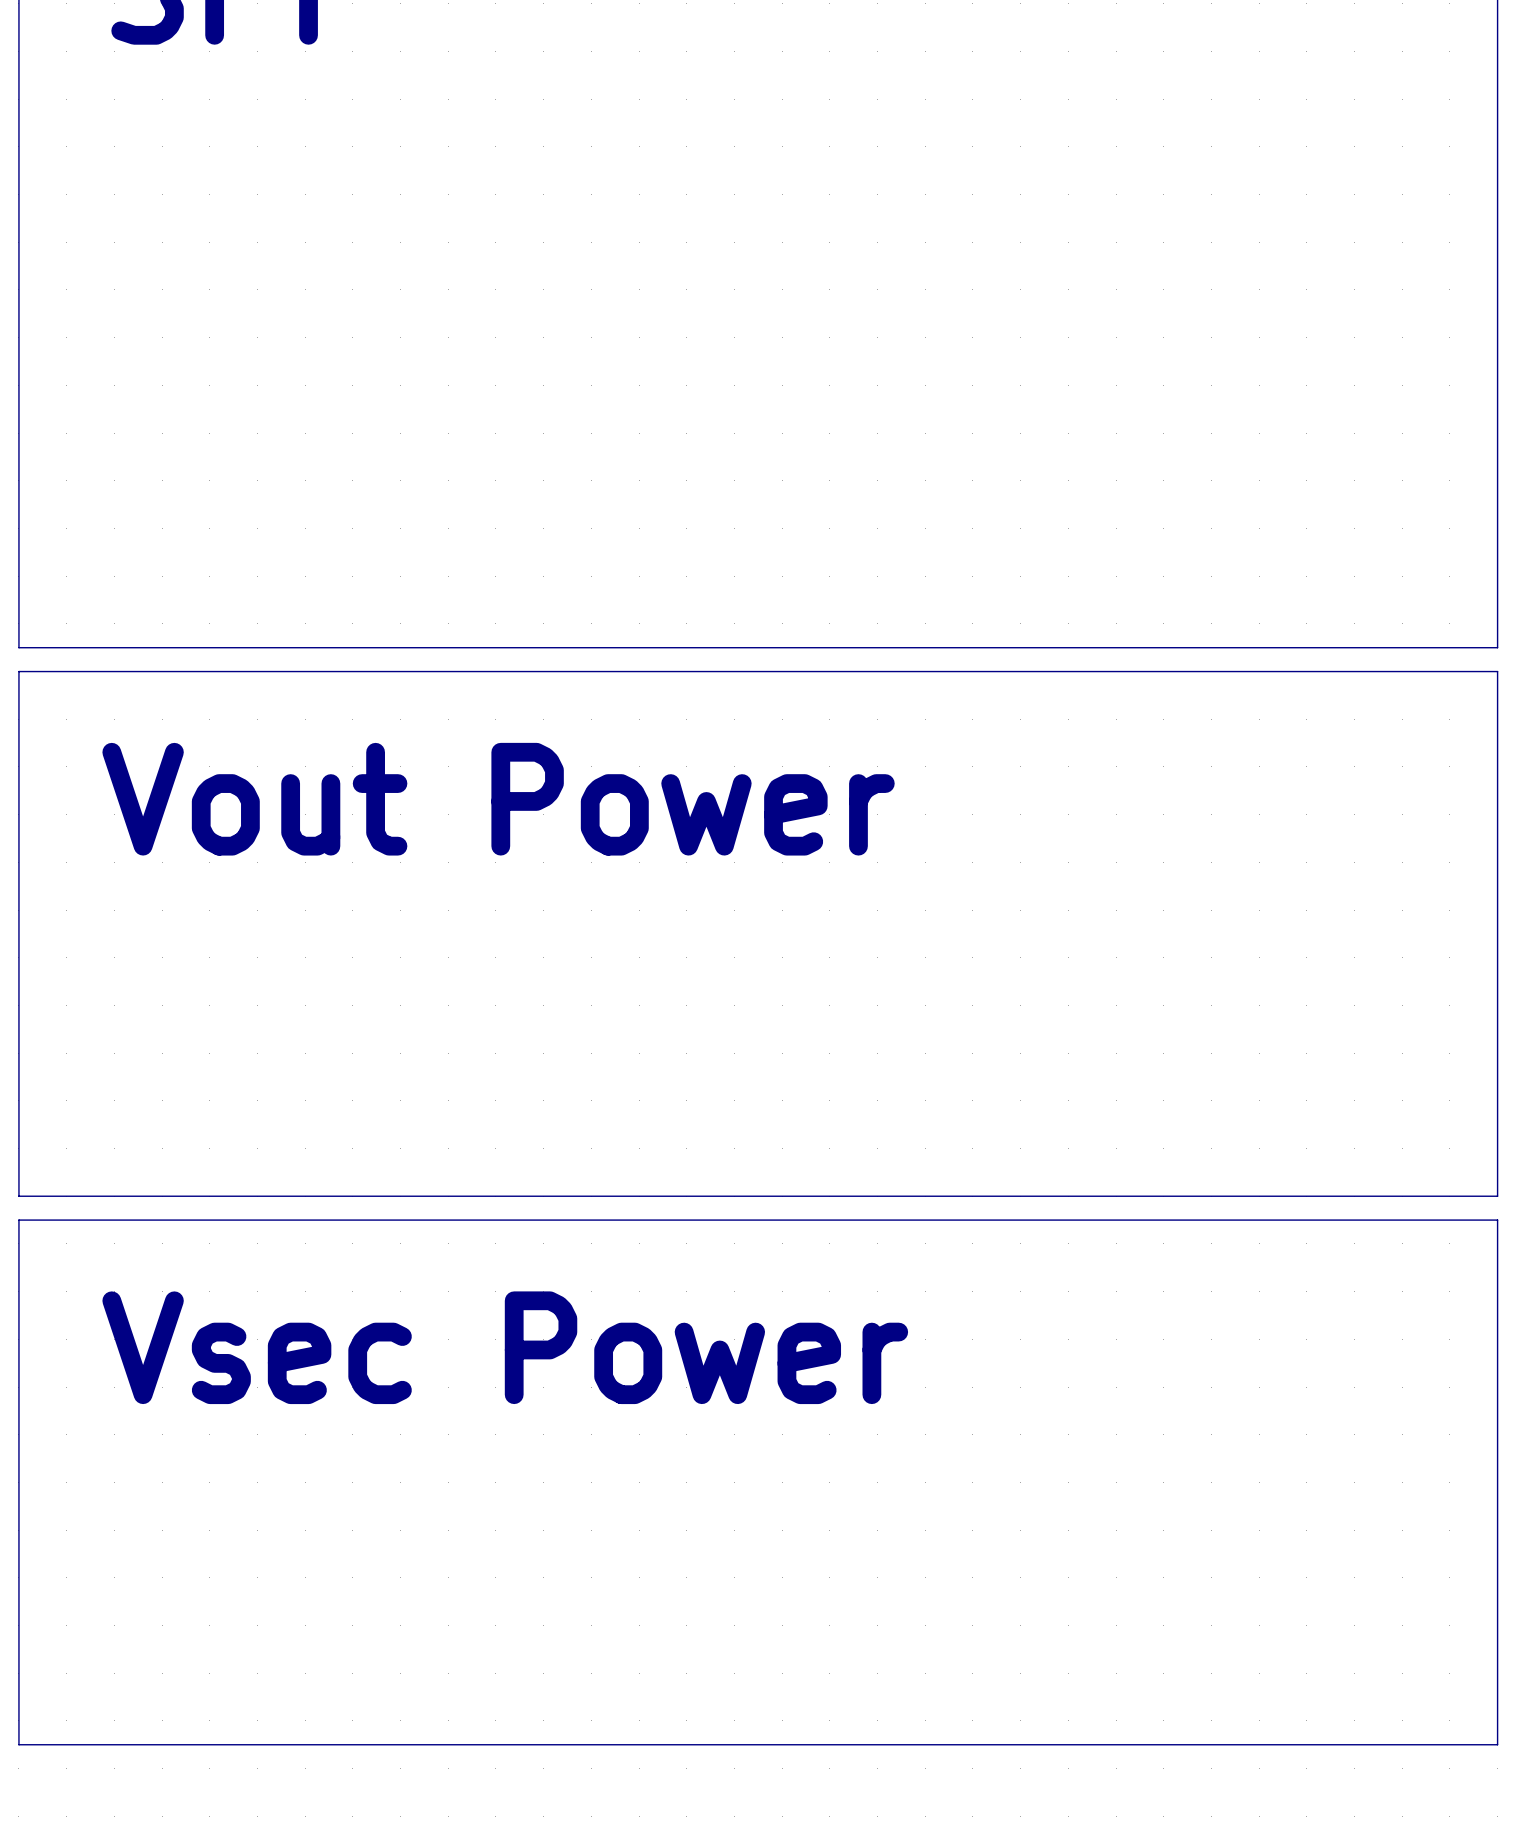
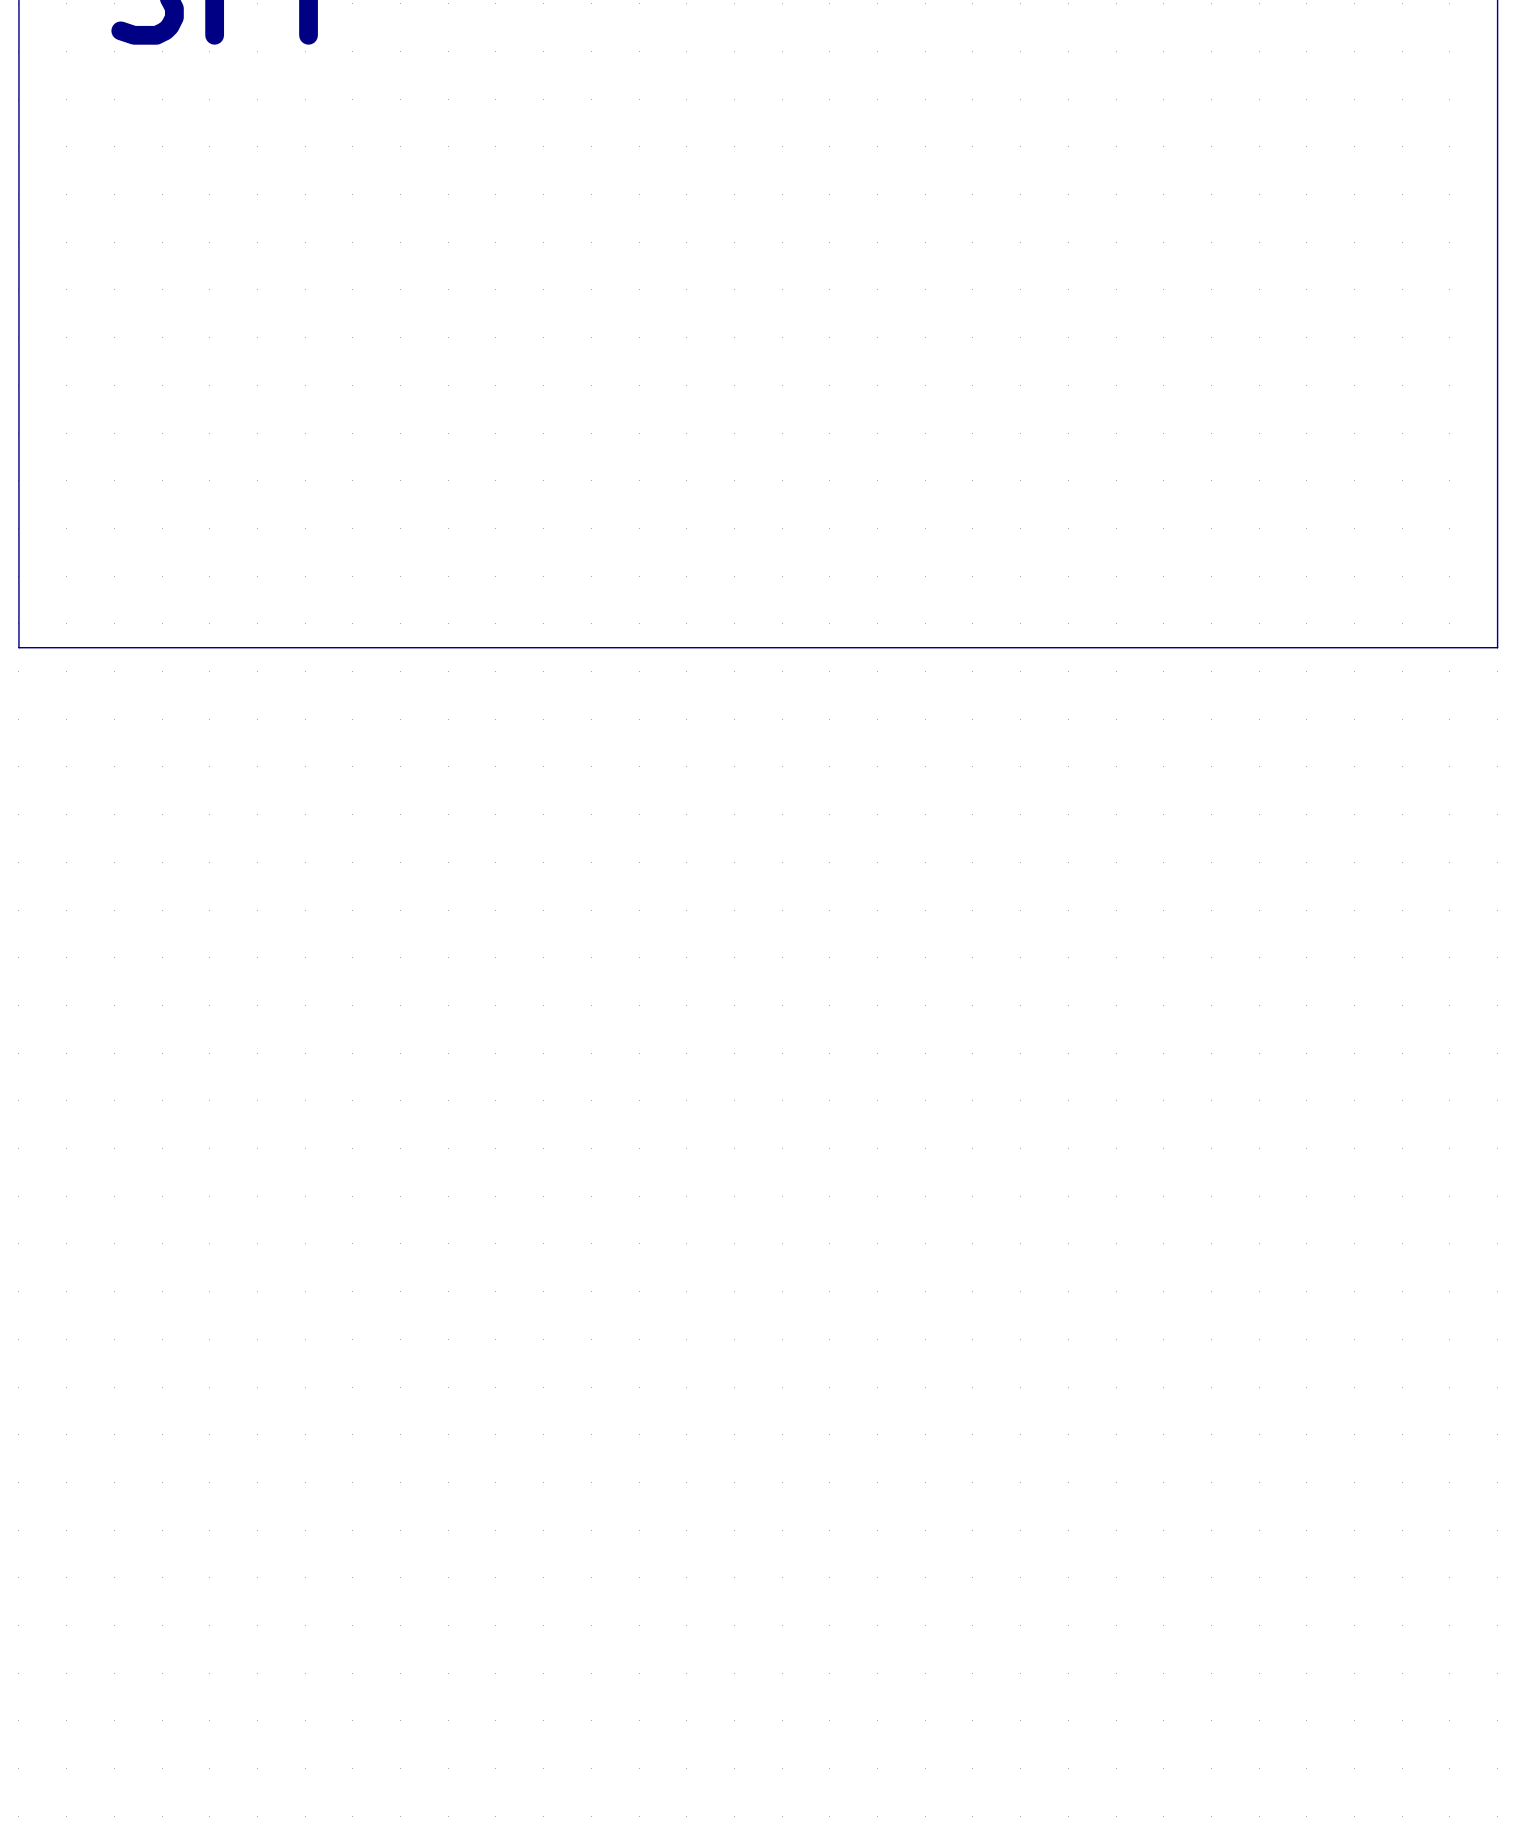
line: (18, 671) (18, 1196) (1497, 1196) (1497, 671) (18, 671) -> none
text: Vout Power (498, 799) -> none
line: (18, 1220) (18, 1744) (1497, 1744) (1497, 1220) (18, 1220) -> none
text: Vsec Power (505, 1347) -> none

